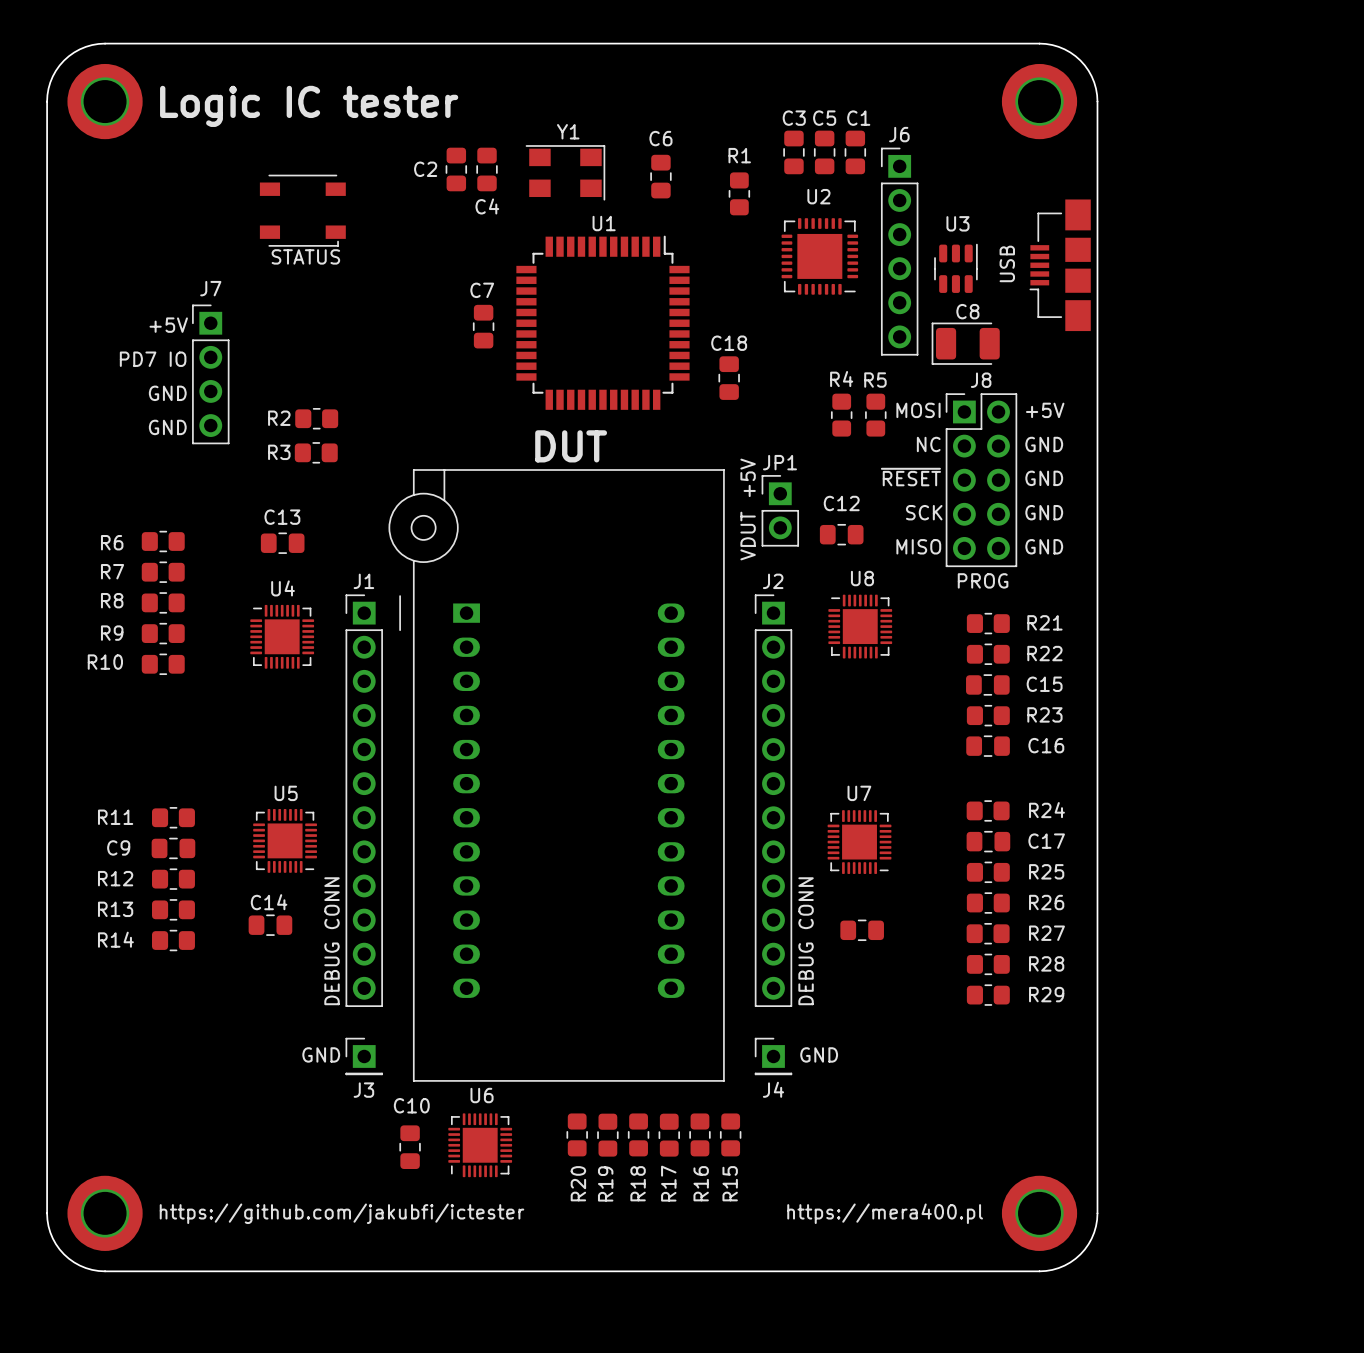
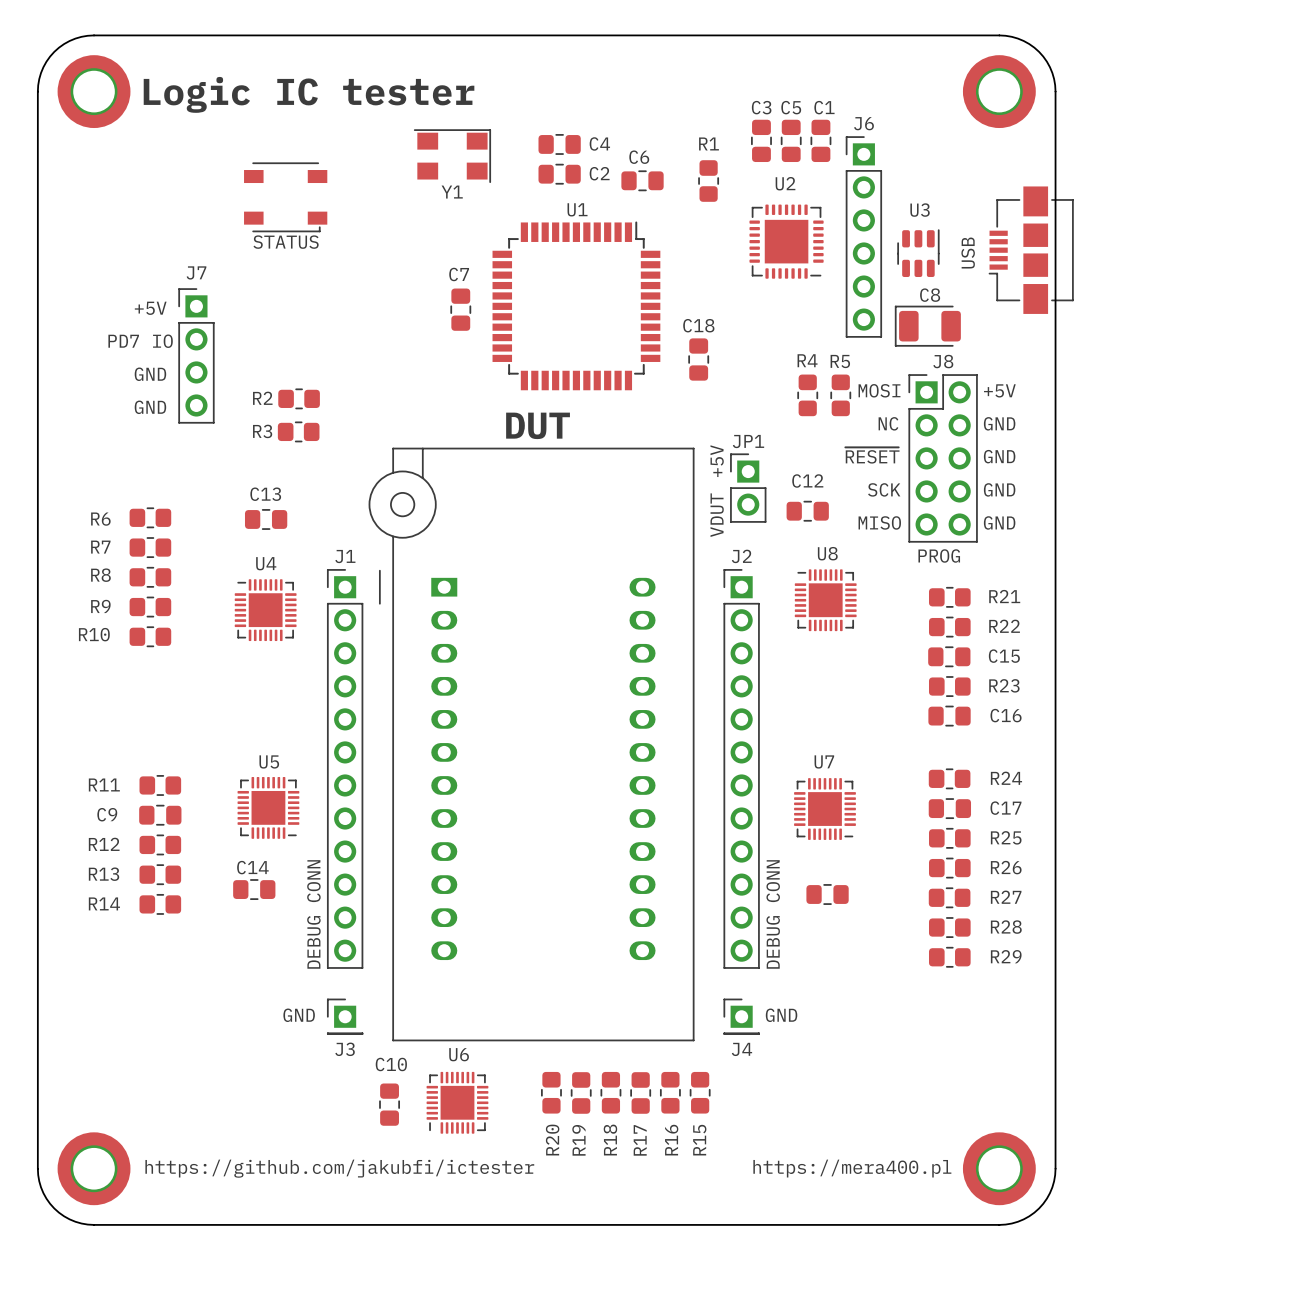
Y1 name position: Y1 (568, 131) -> Y1 (452, 192)
C2 name position: C2 (425, 169) -> C2 (599, 173)
C2 rotation: 0° (456, 169) -> 90° clockwise (559, 174)
C2 position: (456, 169) -> (559, 174)
C4 rotation: 0° (487, 169) -> 90° clockwise (559, 144)
C4 position: (487, 169) -> (559, 144)
Y1 position: (565, 172) -> (452, 156)
C6 rotation: 0° (660, 176) -> 90° clockwise (642, 180)
part footprint: [1029, 199, 1091, 332] -> [988, 186, 1074, 314]
C4 name position: C4 (487, 206) -> C4 (599, 143)

